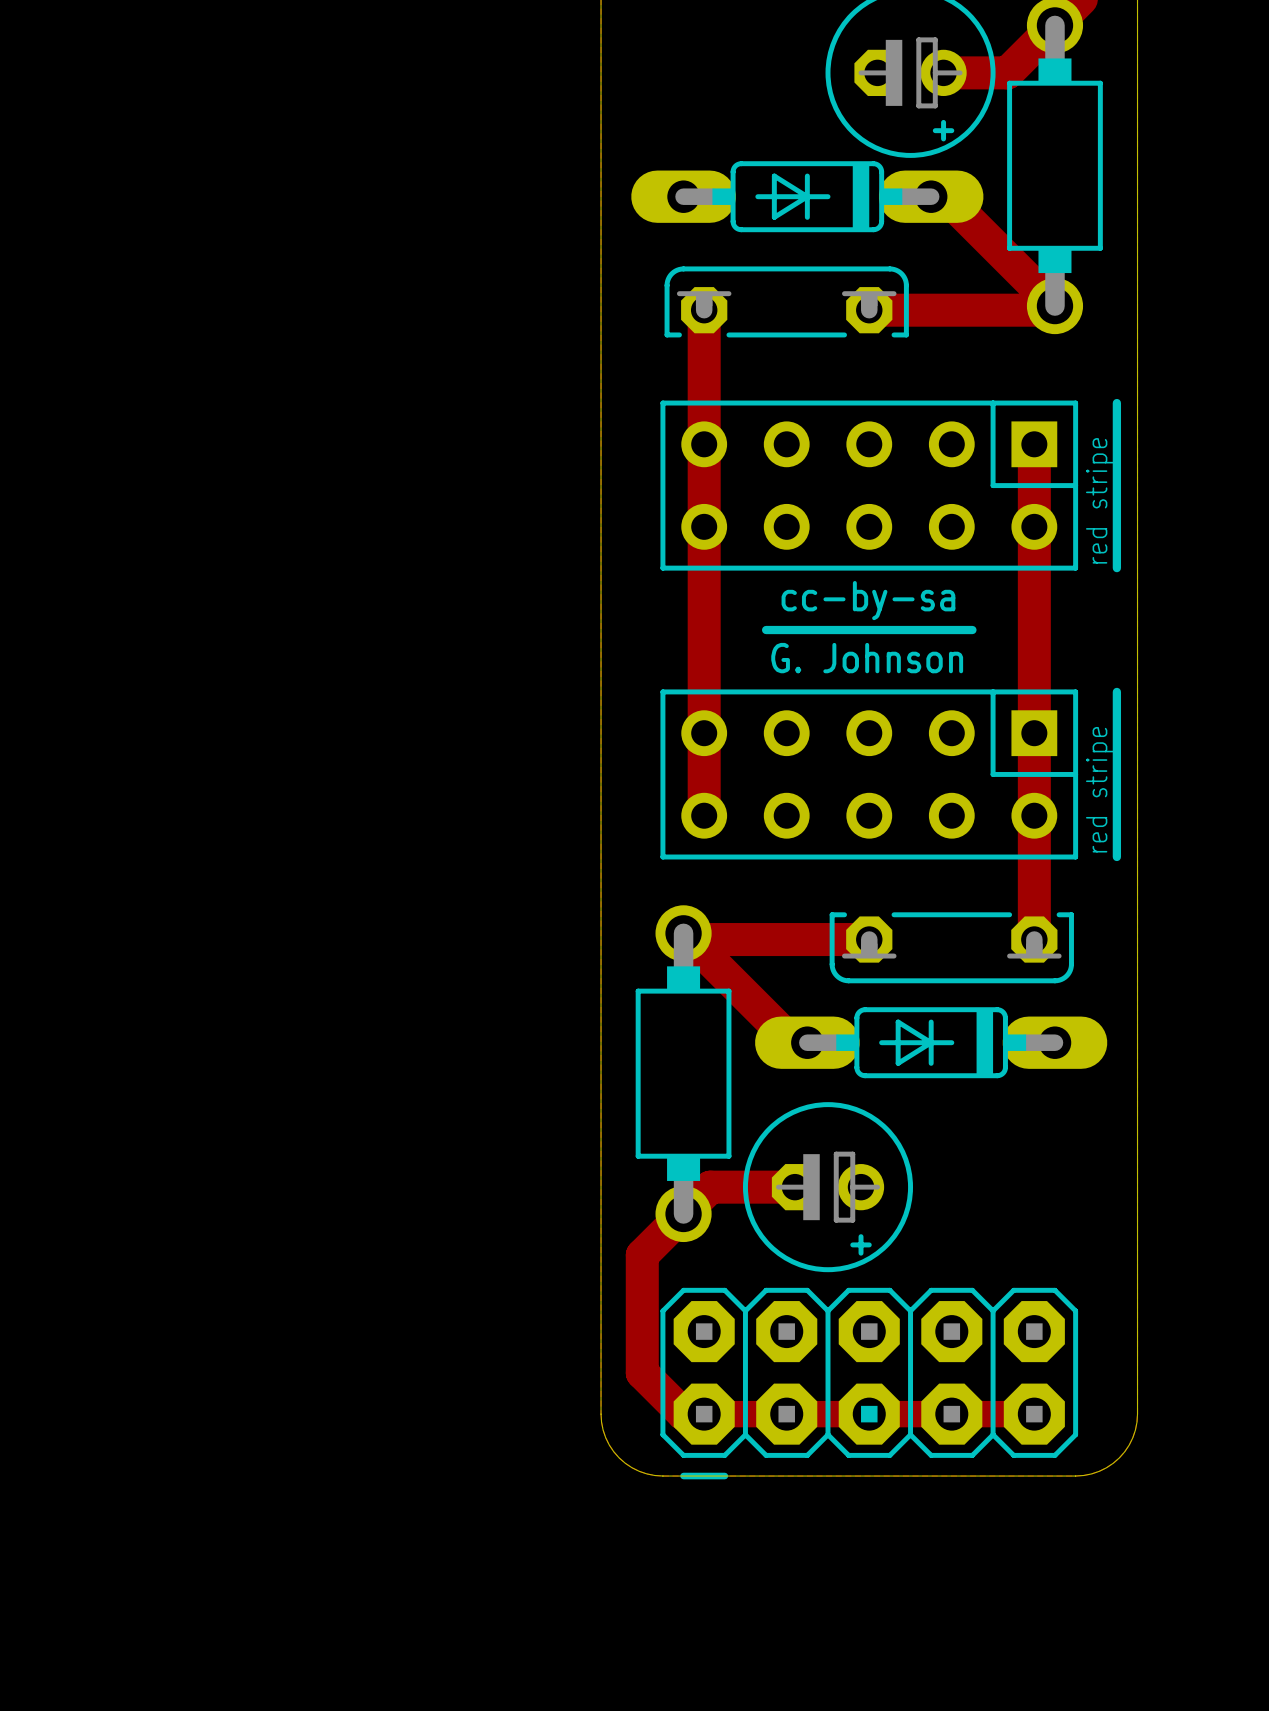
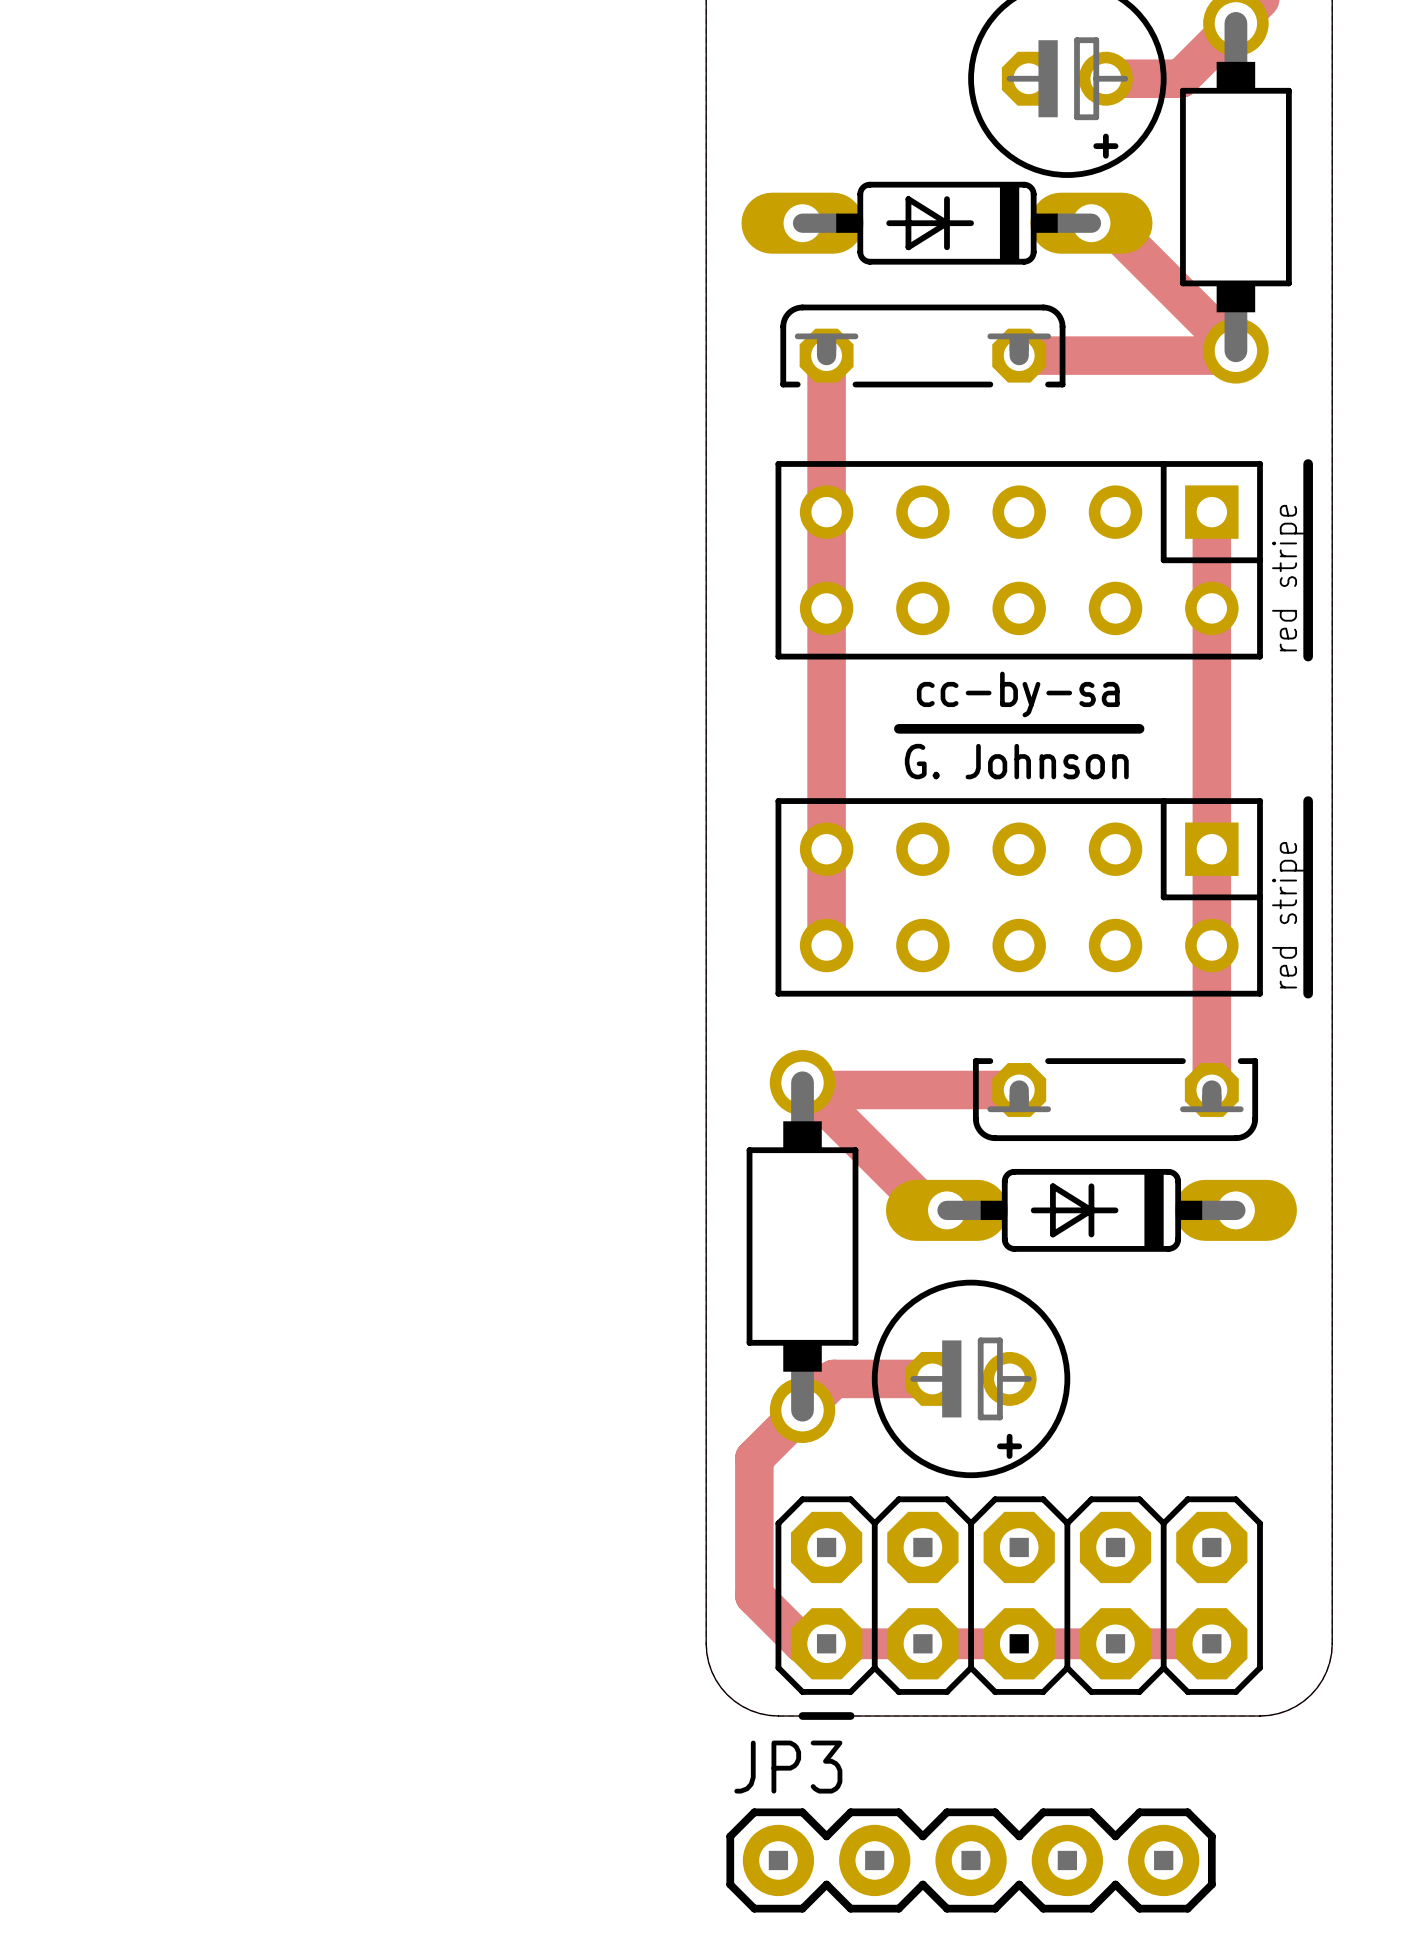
JP3: none -> (971, 1860)

